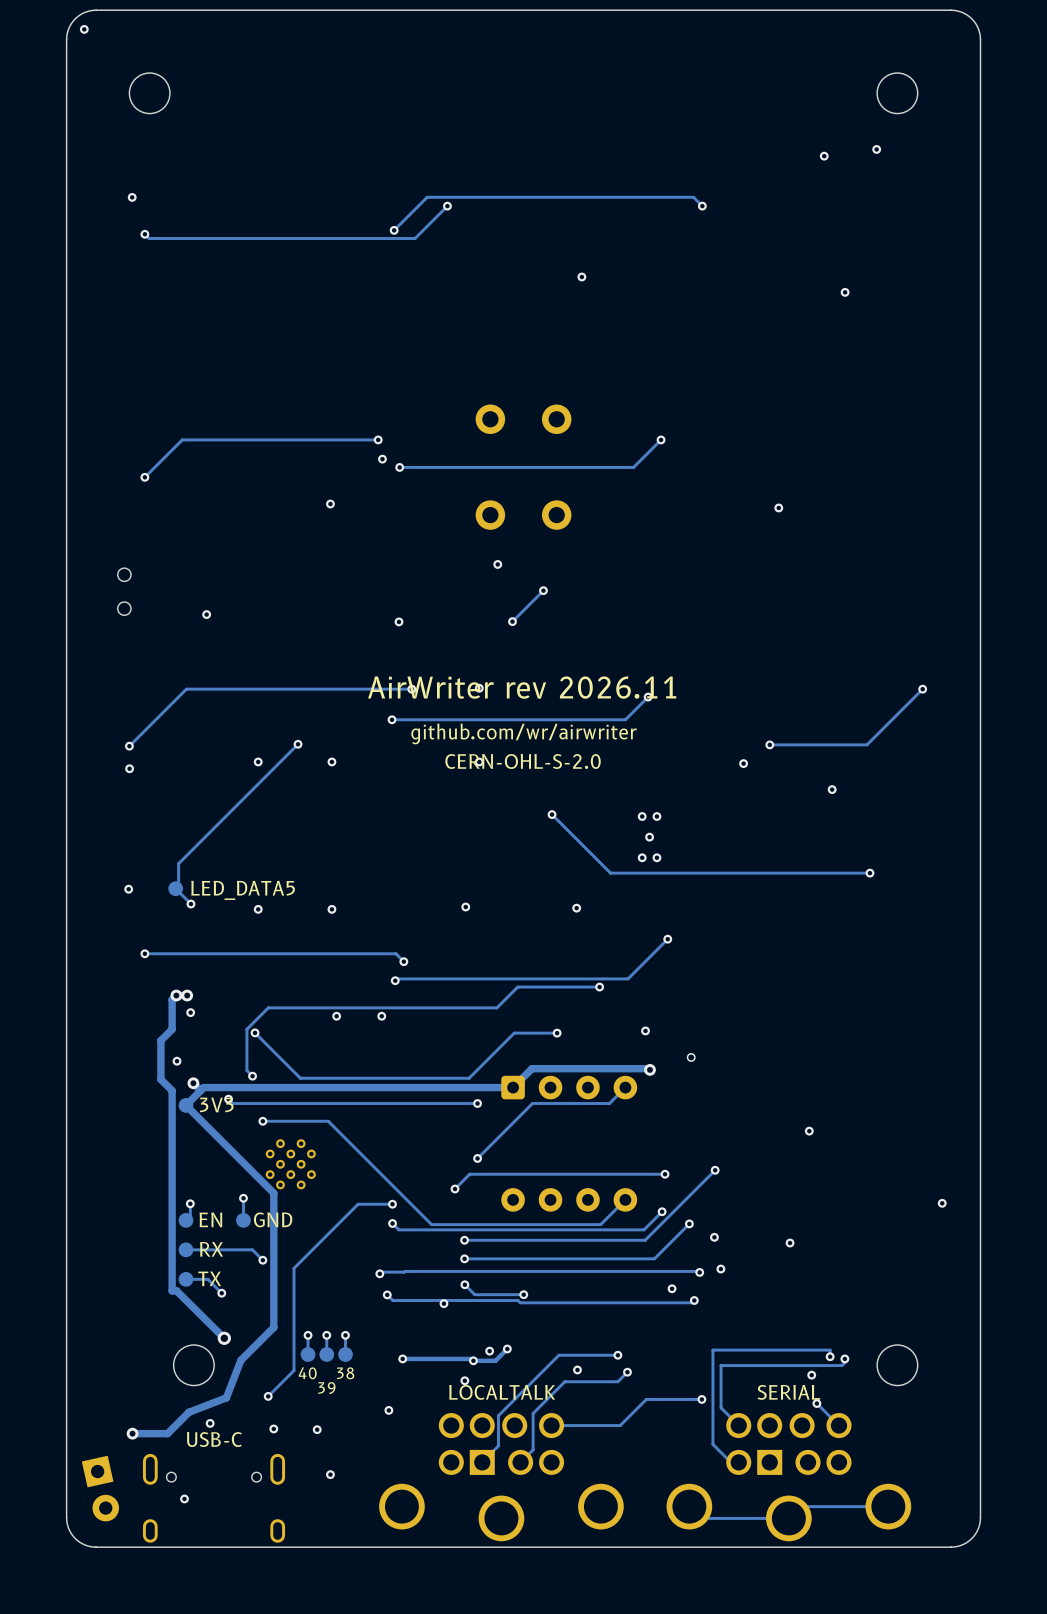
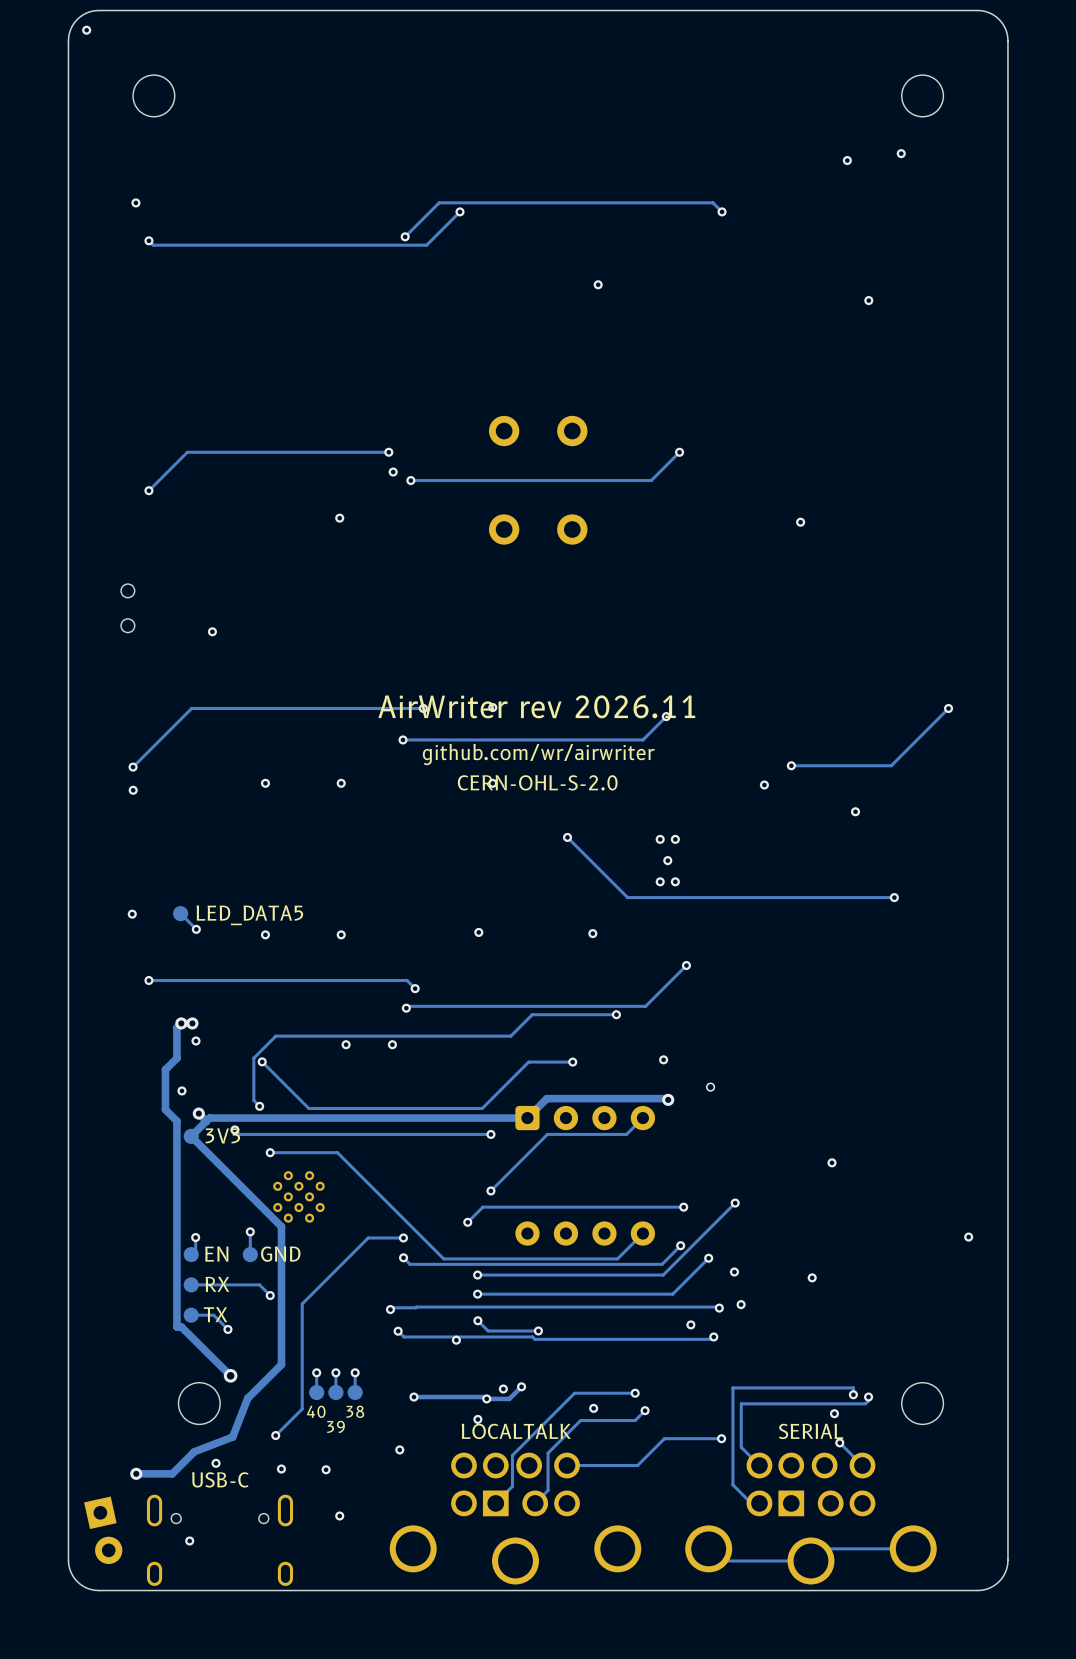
via: (497, 564) -> none
track: (543, 590) (512, 621) -> none
via: (543, 590) -> none
via: (398, 621) -> none
via: (512, 621) -> none
track: (298, 744) (178, 863) (178, 882) (175, 888) -> none
via: (298, 744) -> none

